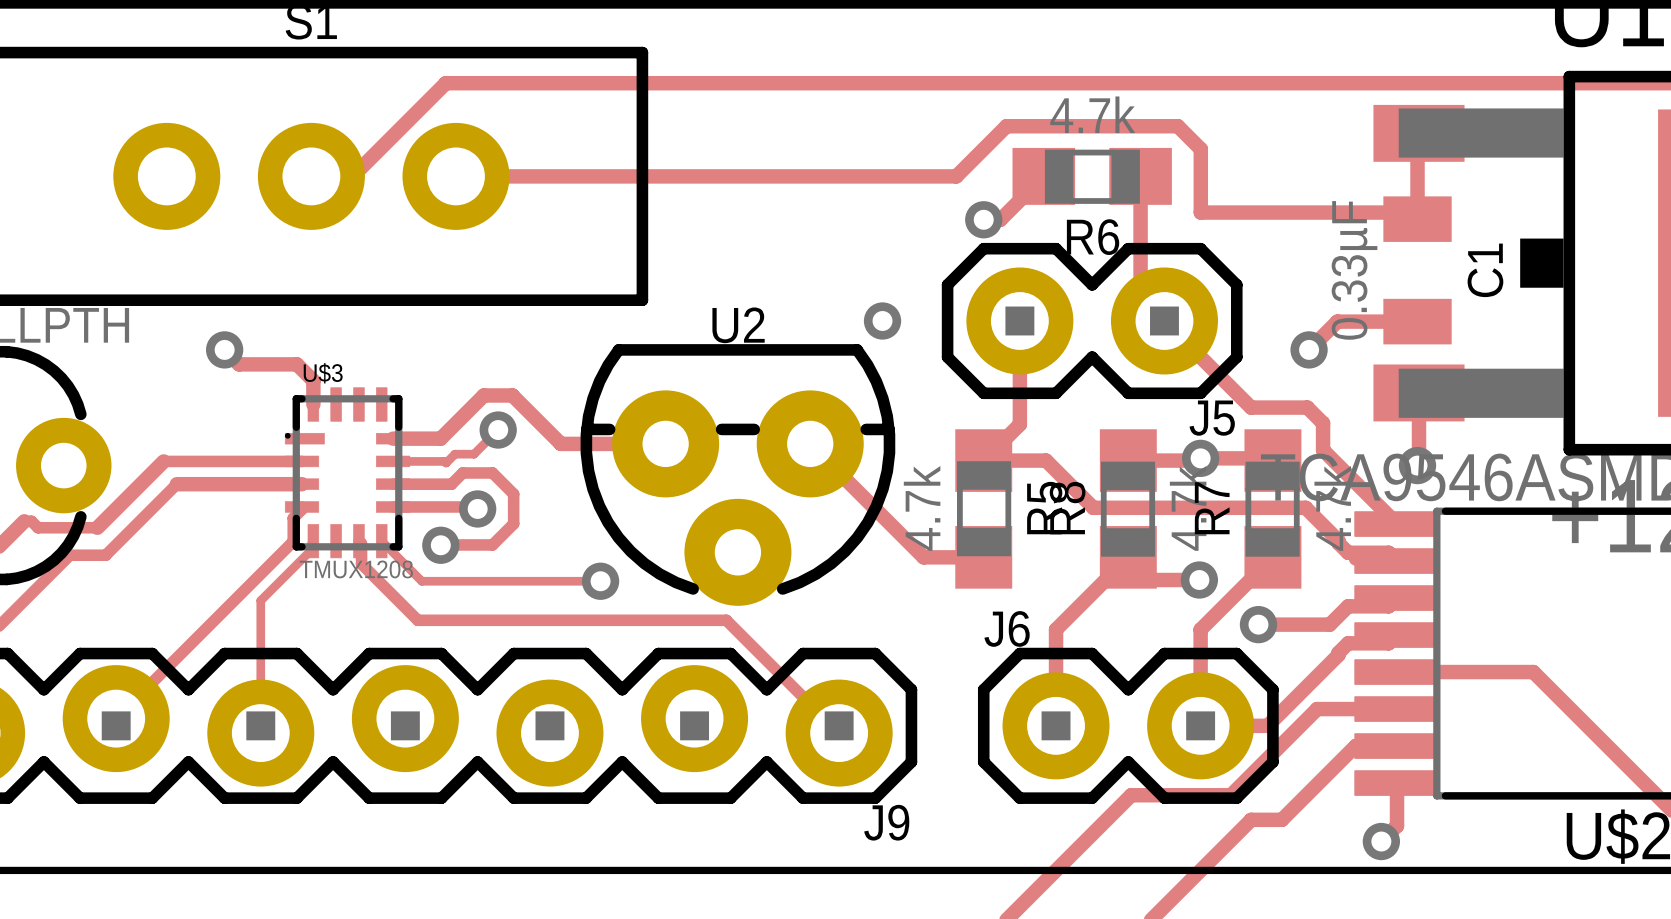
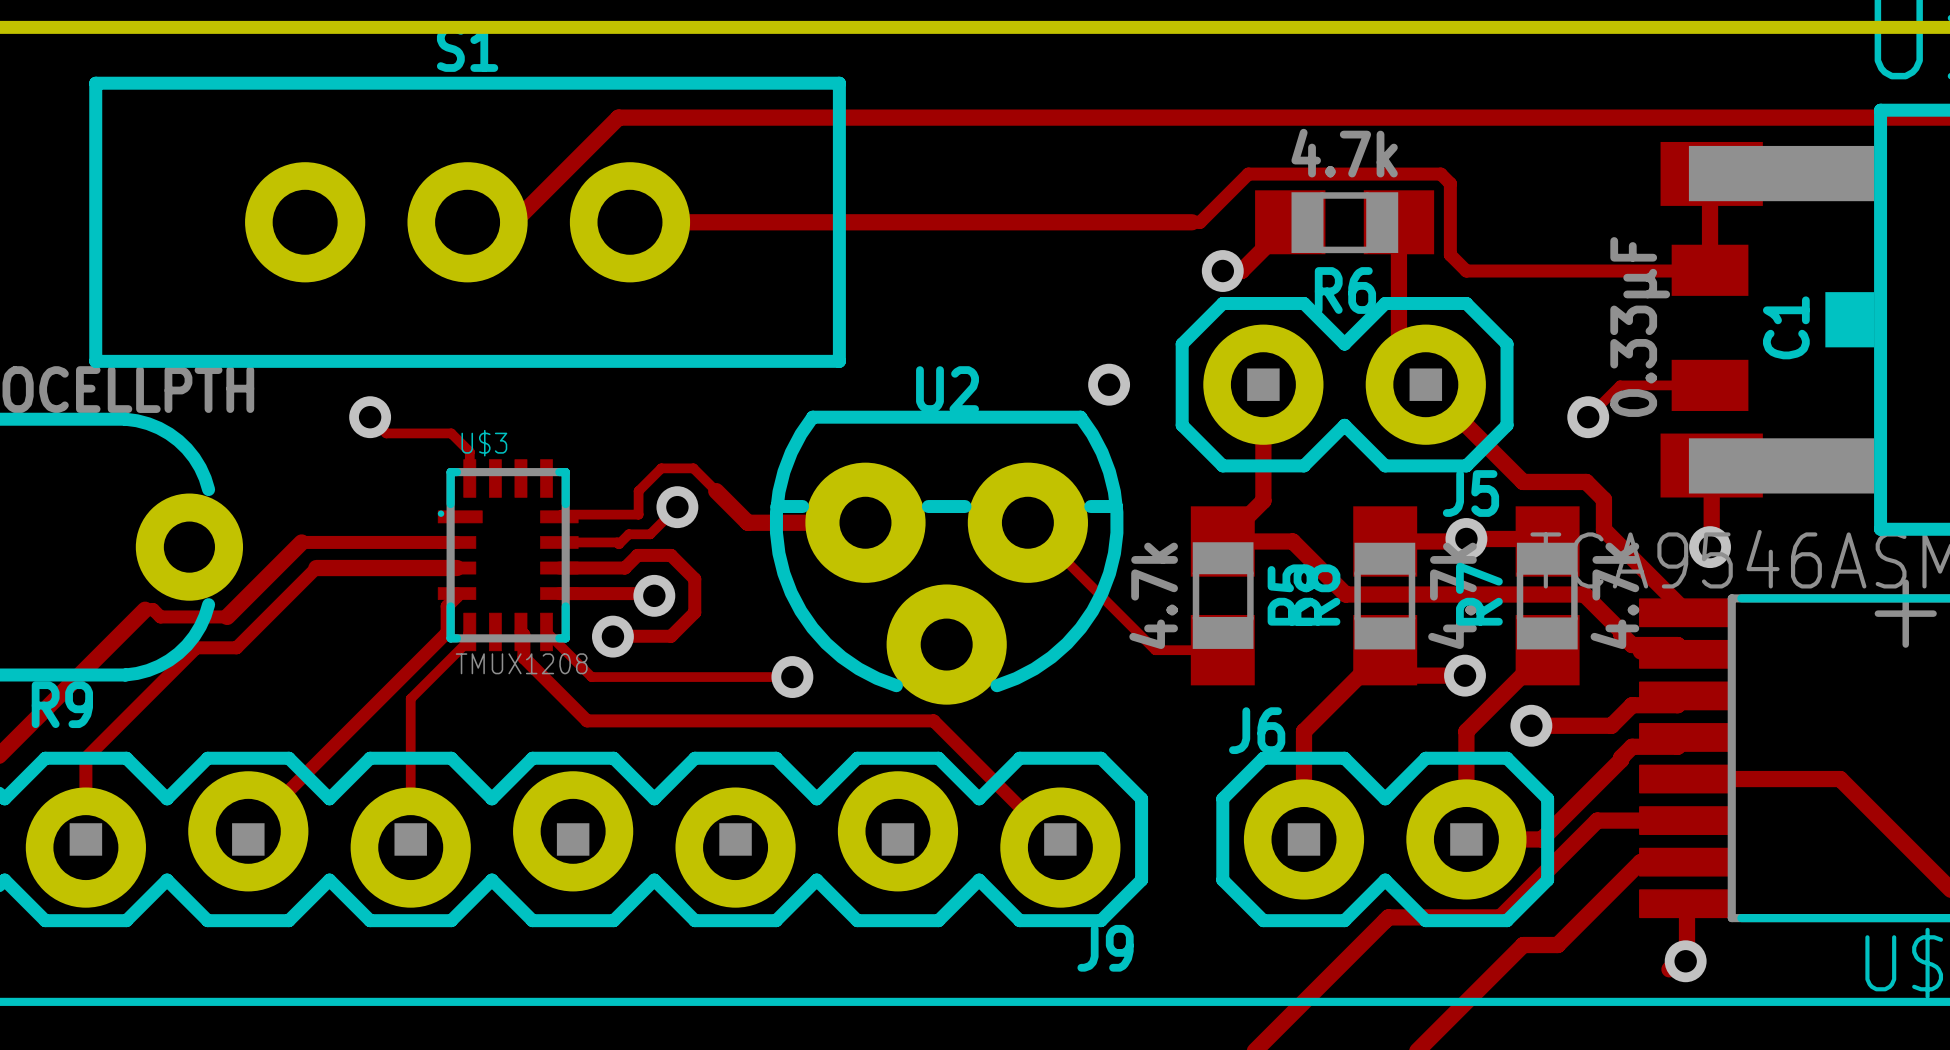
track: (956, 176) (1006, 126) (1177, 126) (1200, 149) (1200, 212) (1410, 212) (1417, 219) -> (1192, 222) (1200, 222) (1248, 174) (1440, 174) (1450, 183) (1450, 254) (1466, 271) (1709, 271)
track width: thick (1417, 321) (1337, 321) (1309, 349) -> thin (1710, 385) (1620, 385) (1588, 417)
track width: thick (224, 349) (239, 364) (296, 364) (313, 380) (313, 404) -> thin (370, 417) (386, 433) (451, 433) (469, 451) (469, 478)
track: (463, 415) (440, 438) (393, 438) -> (638, 491) (638, 514) (561, 514) (559, 516)
track width: thick (463, 415) (483, 395) (512, 395) (532, 415) -> thin (638, 491) (661, 468) (693, 468) (716, 491)
track width: thick (810, 443) (923, 557) (983, 557) -> thin (1027, 522) (1155, 650) (1222, 650)
via position: (1381, 841) -> (1685, 961)

